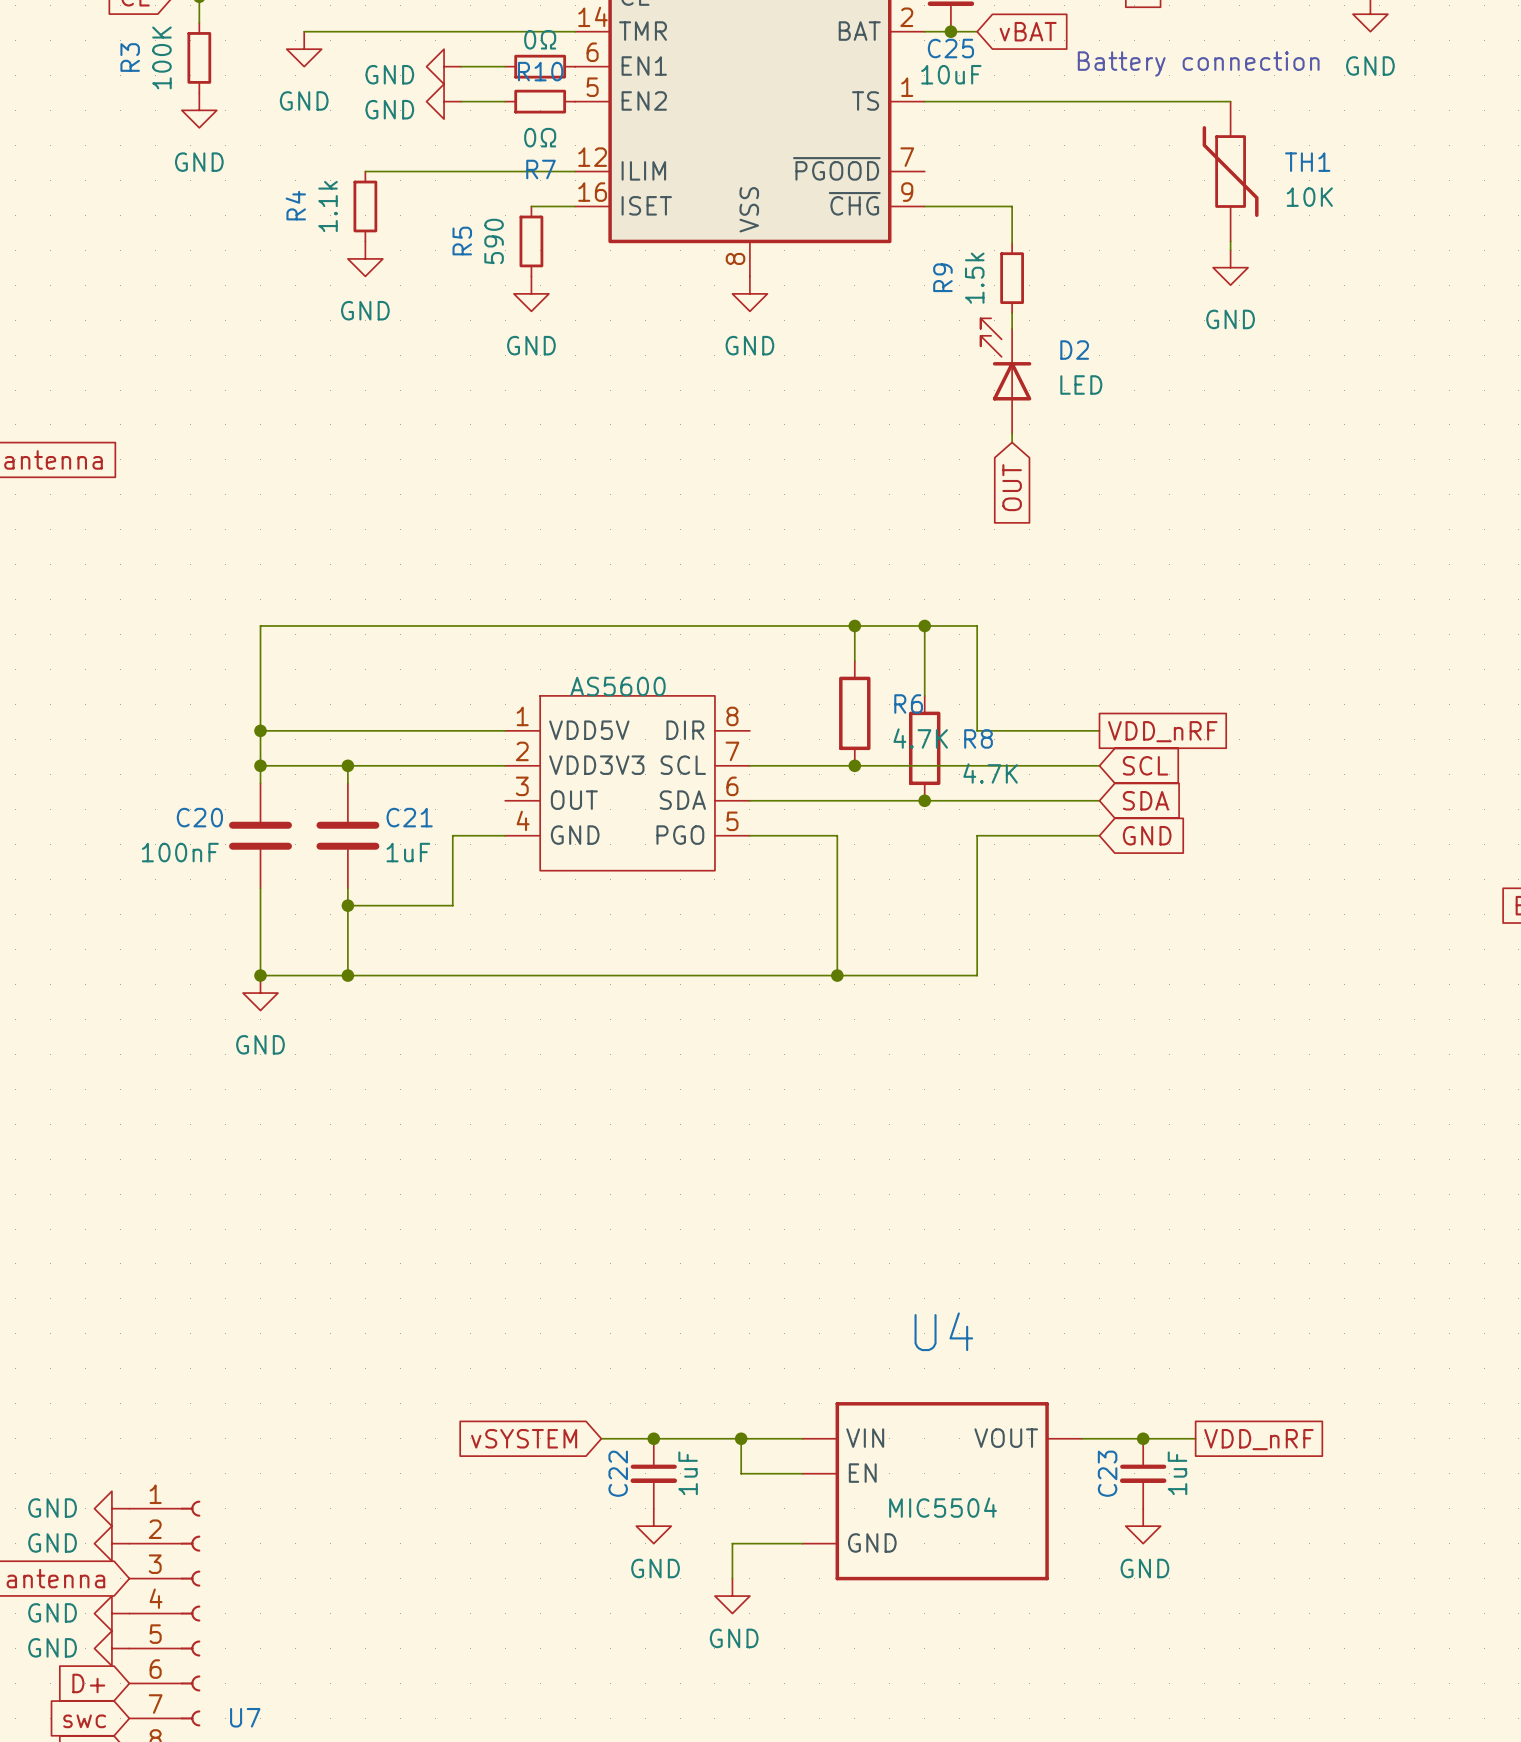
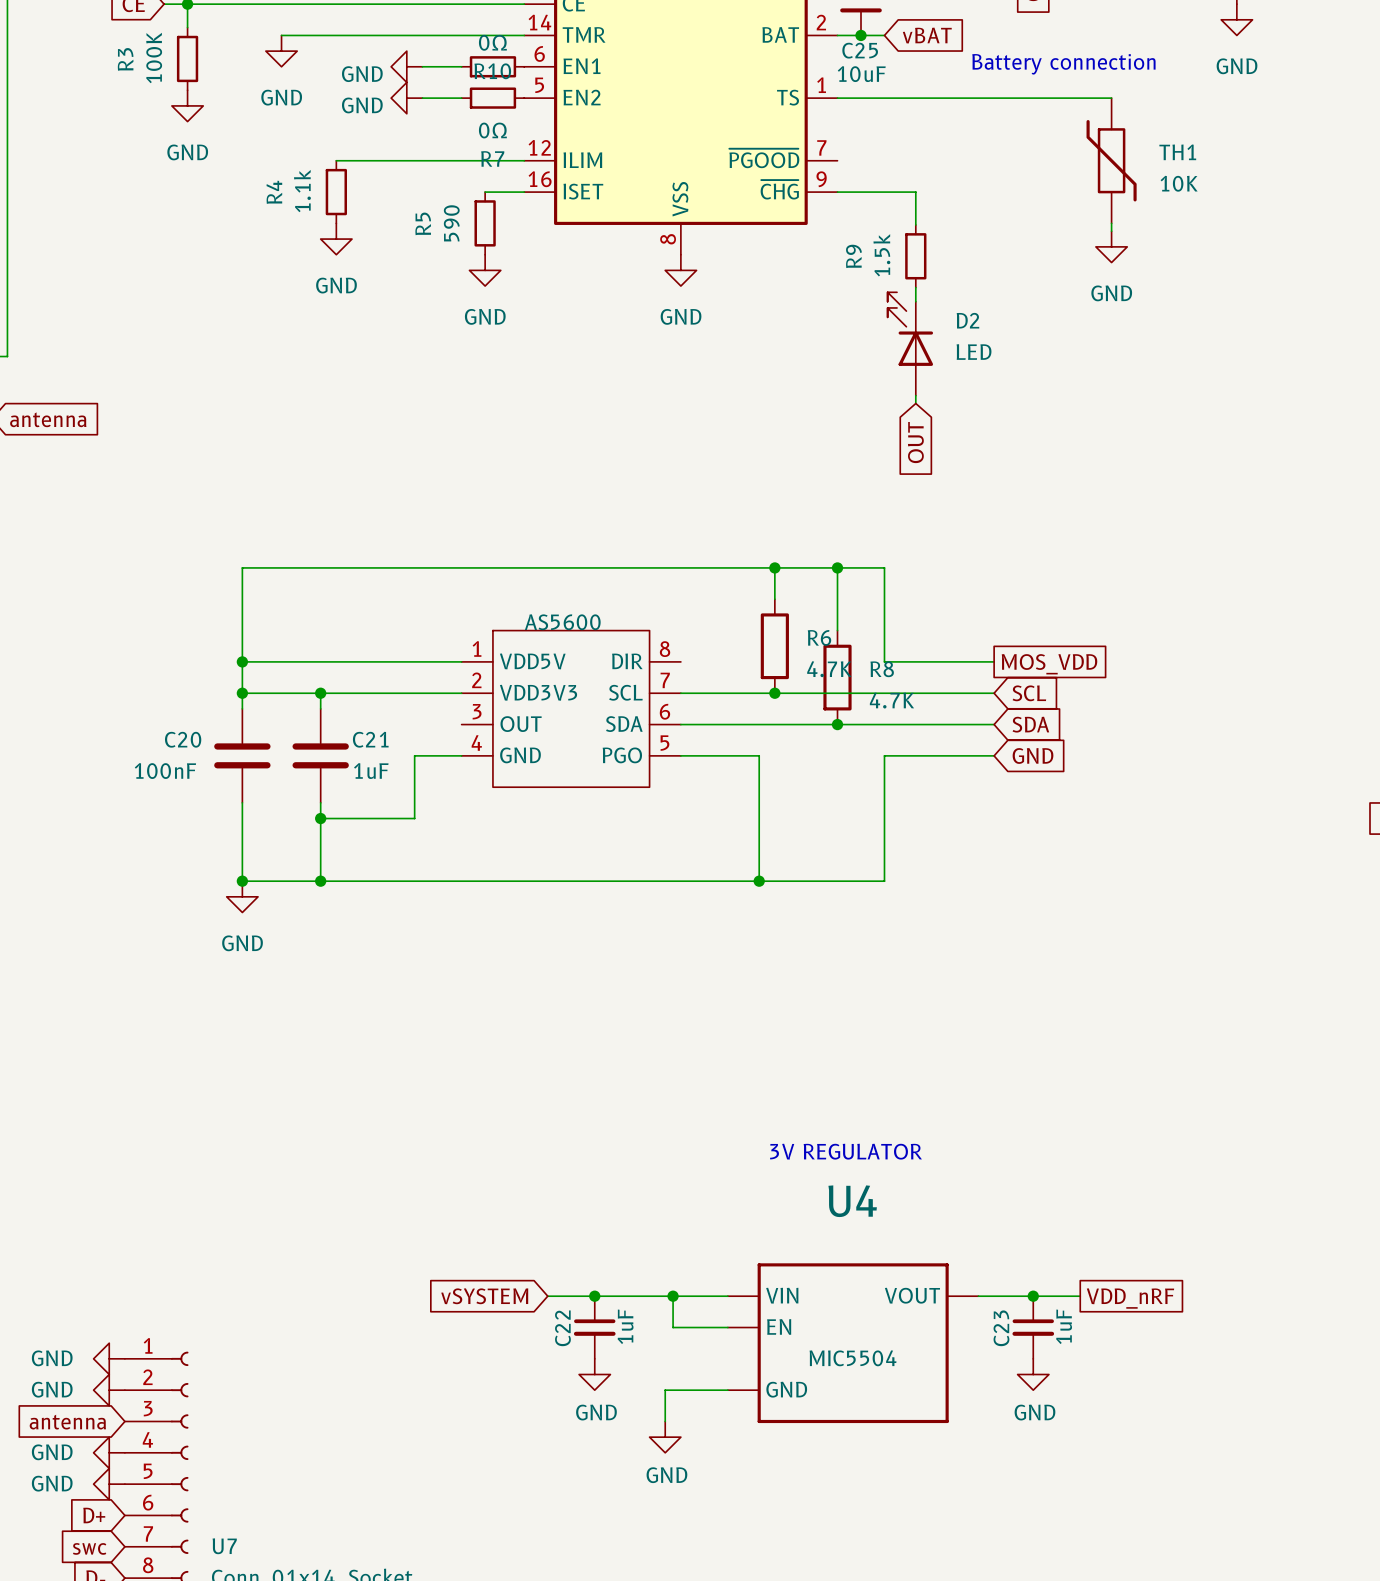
global label: VDD_nRF (1162, 731) -> MOS_VDD (1049, 664)
text: none -> 3V REGULATOR (846, 1151)

